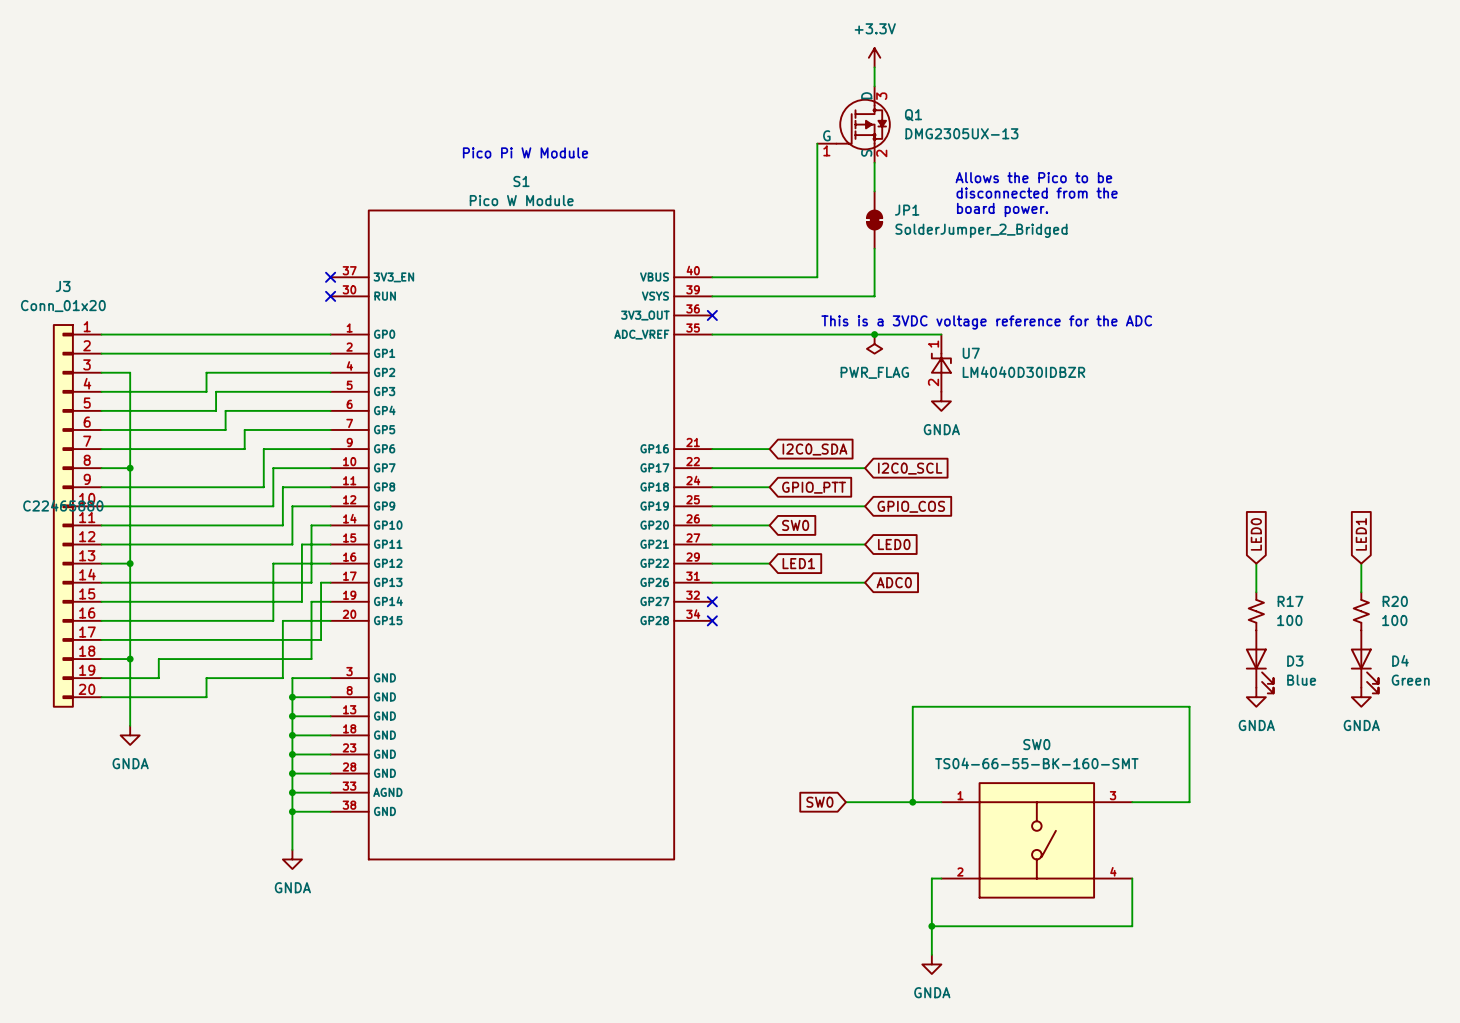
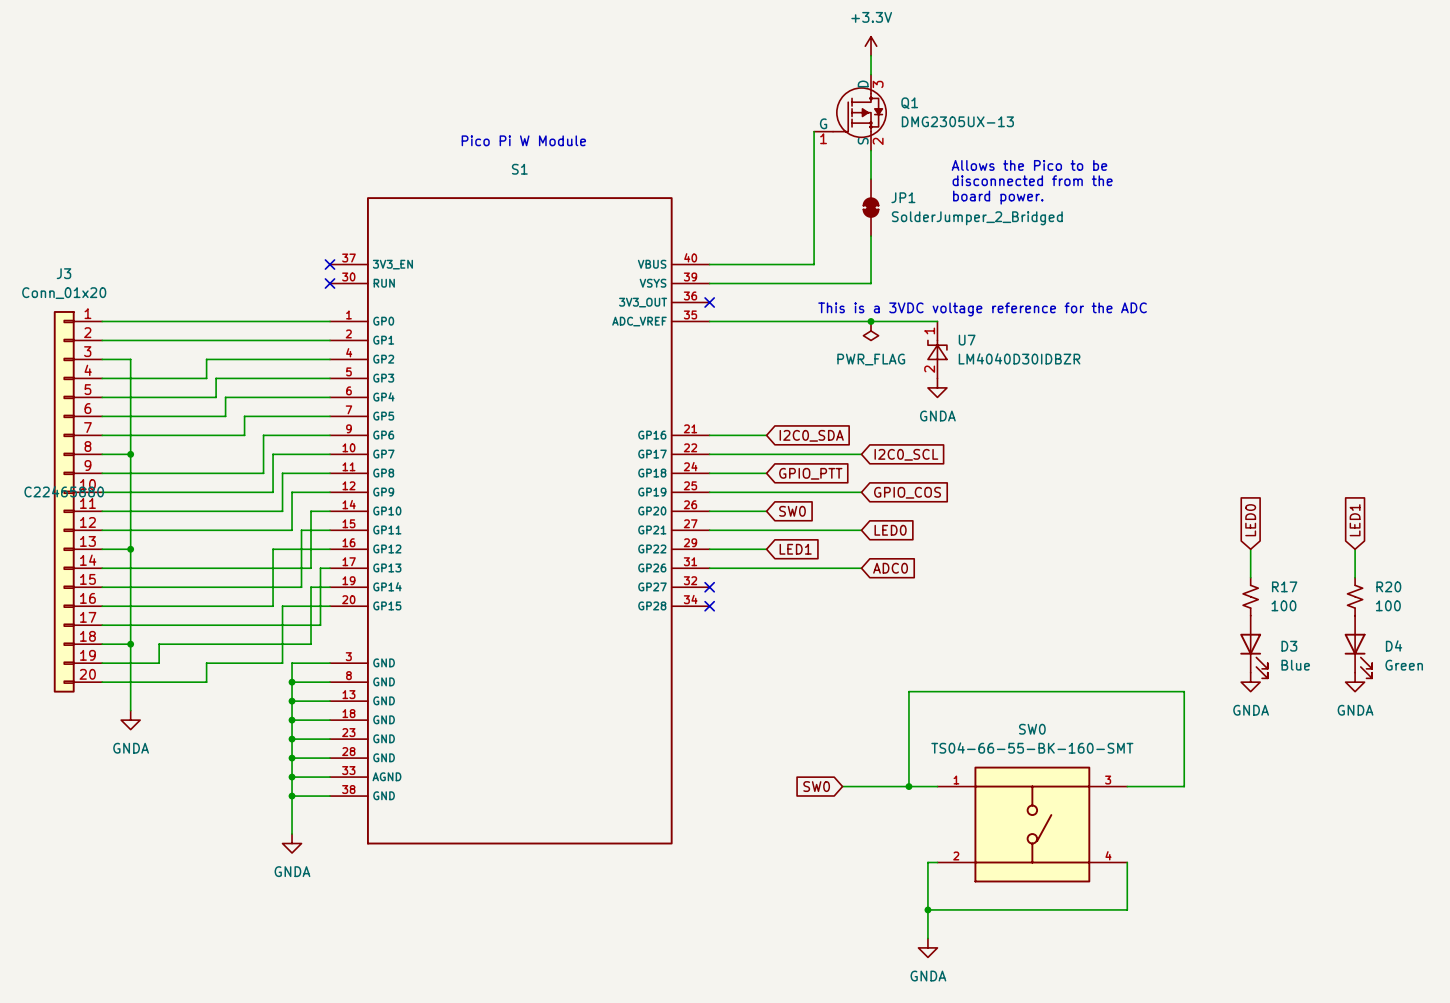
S1 value: Pico W Module (521, 200) -> none

